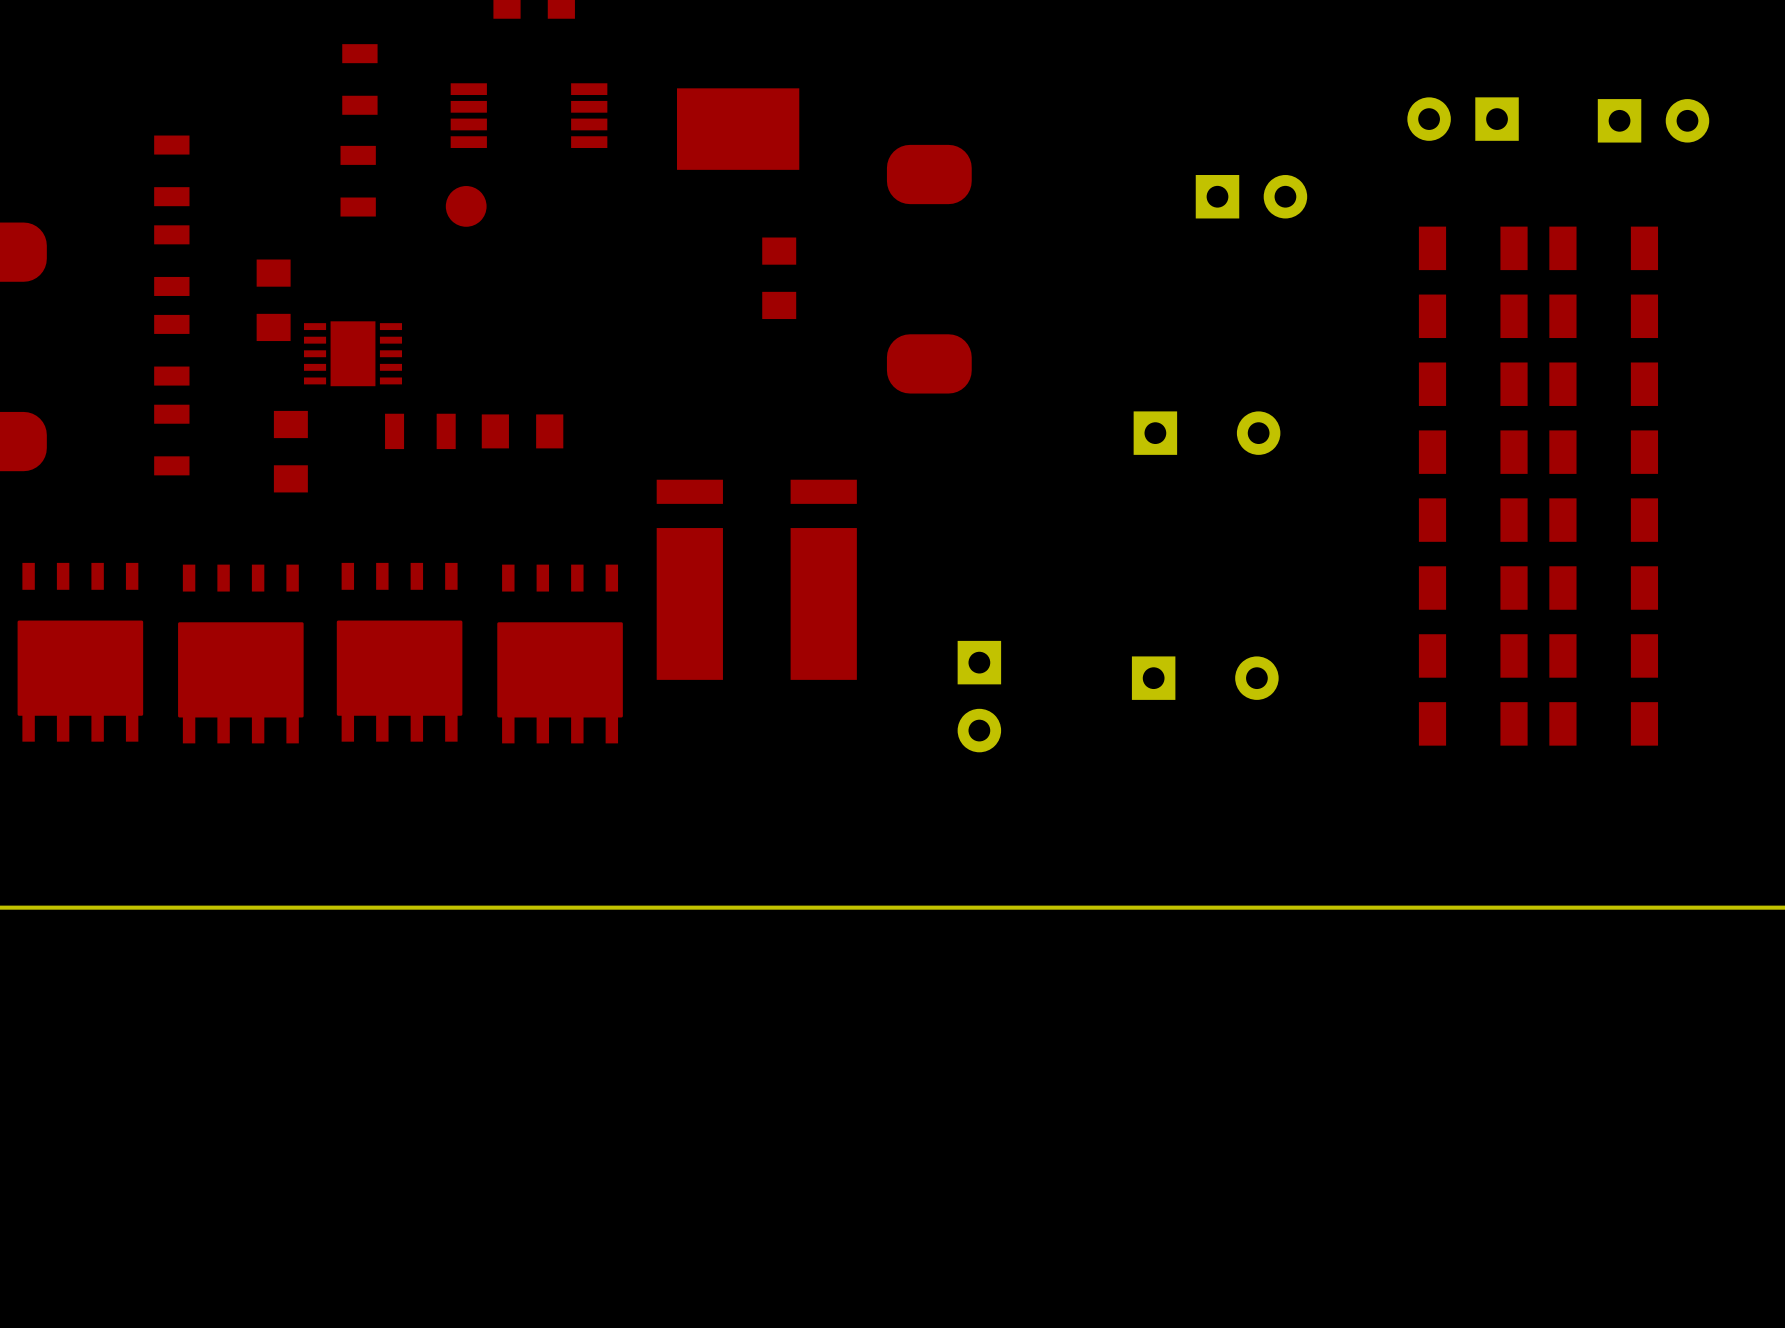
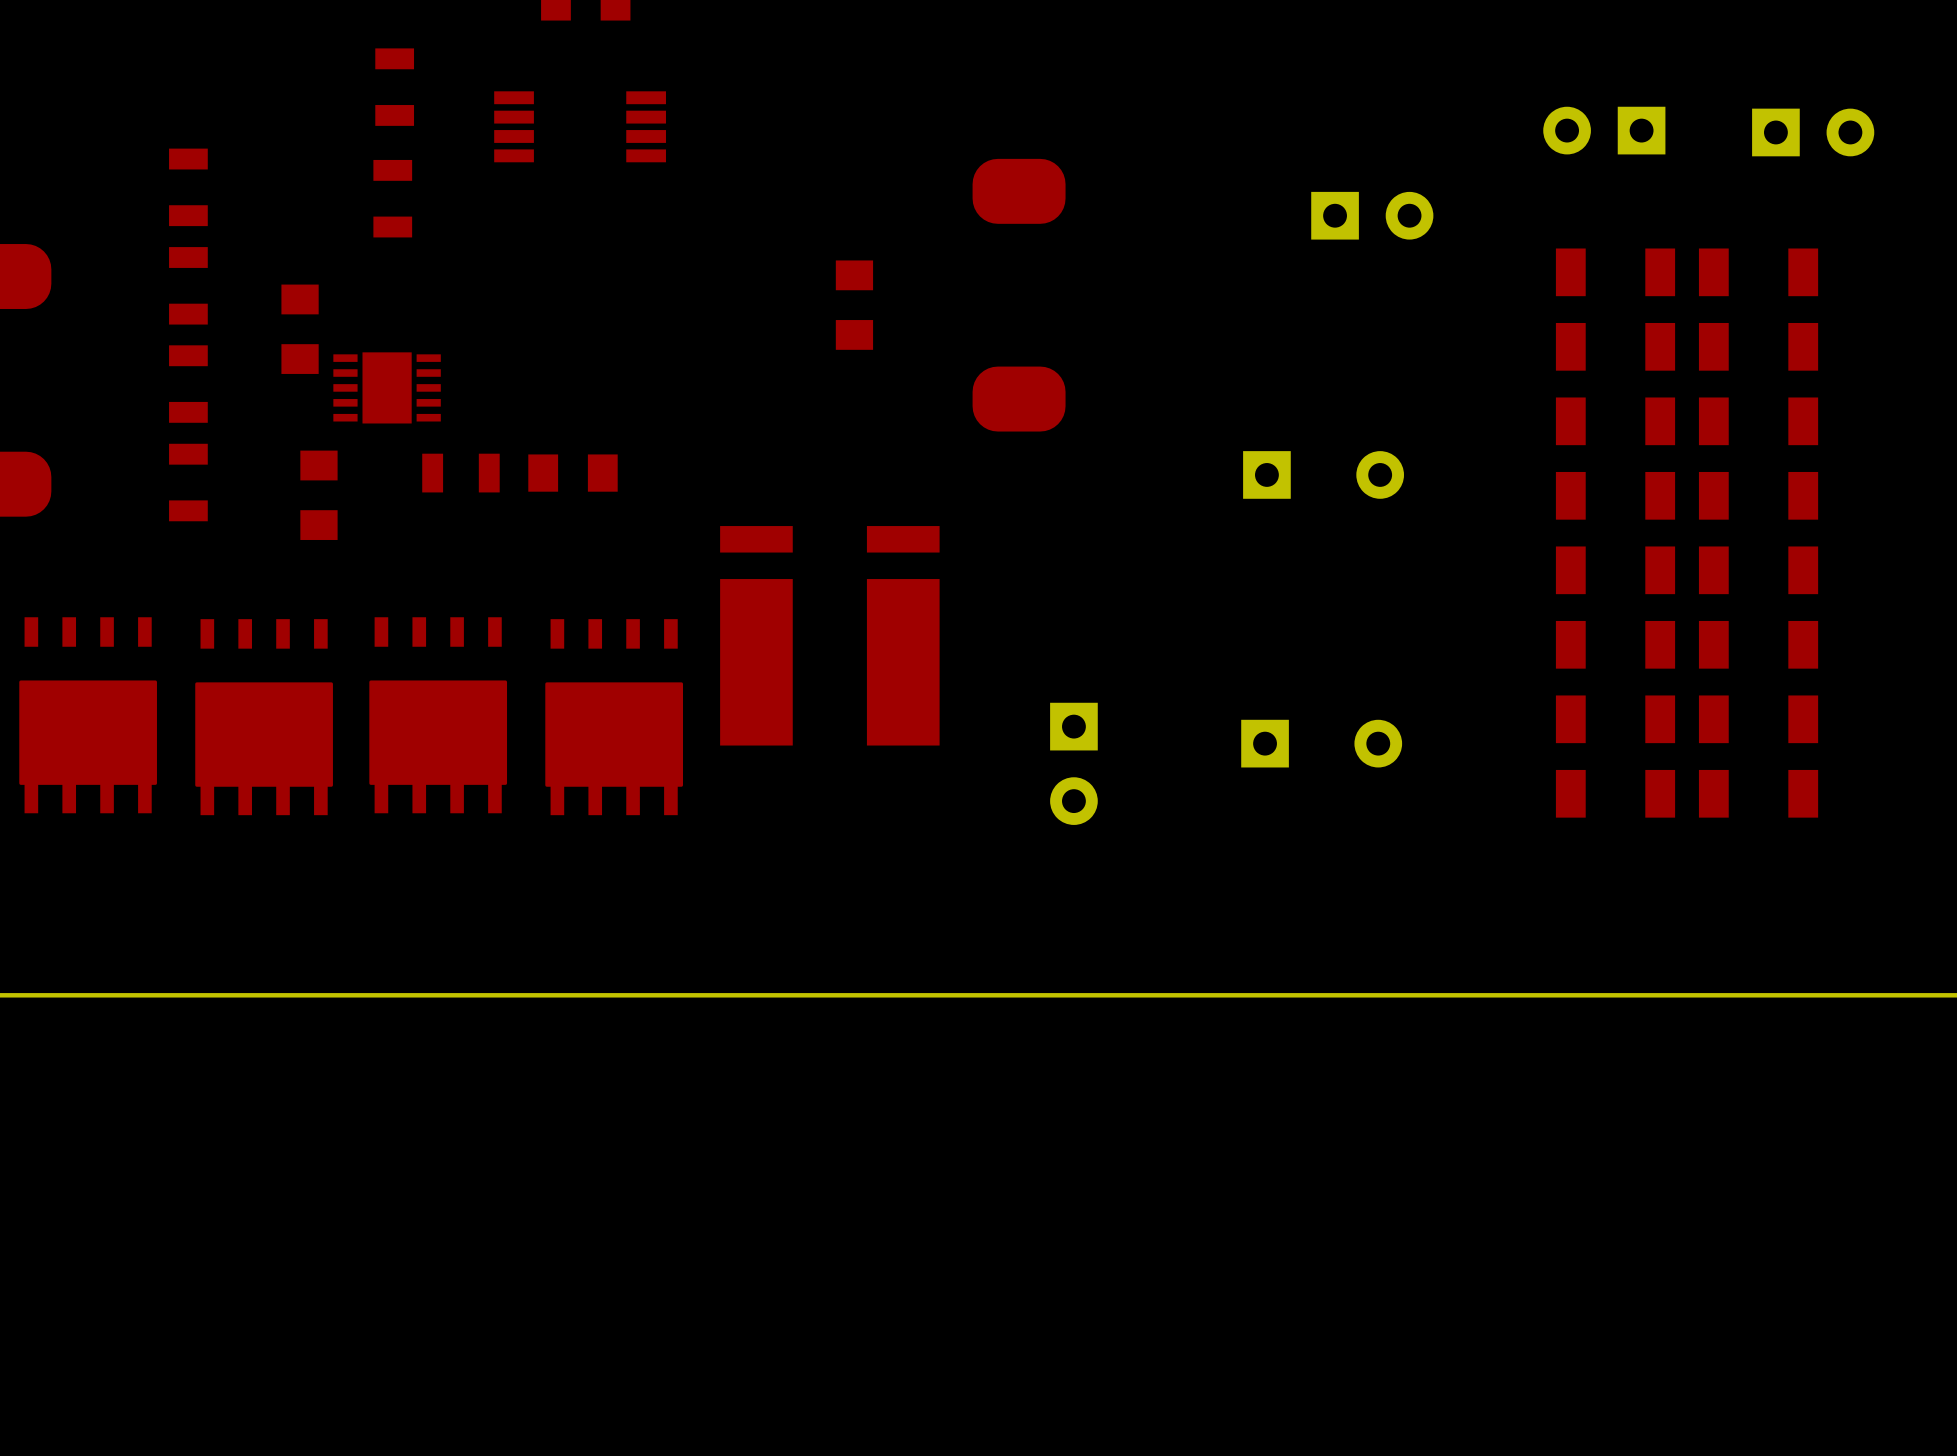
part: (738, 129) -> none
part: (466, 206) -> none

